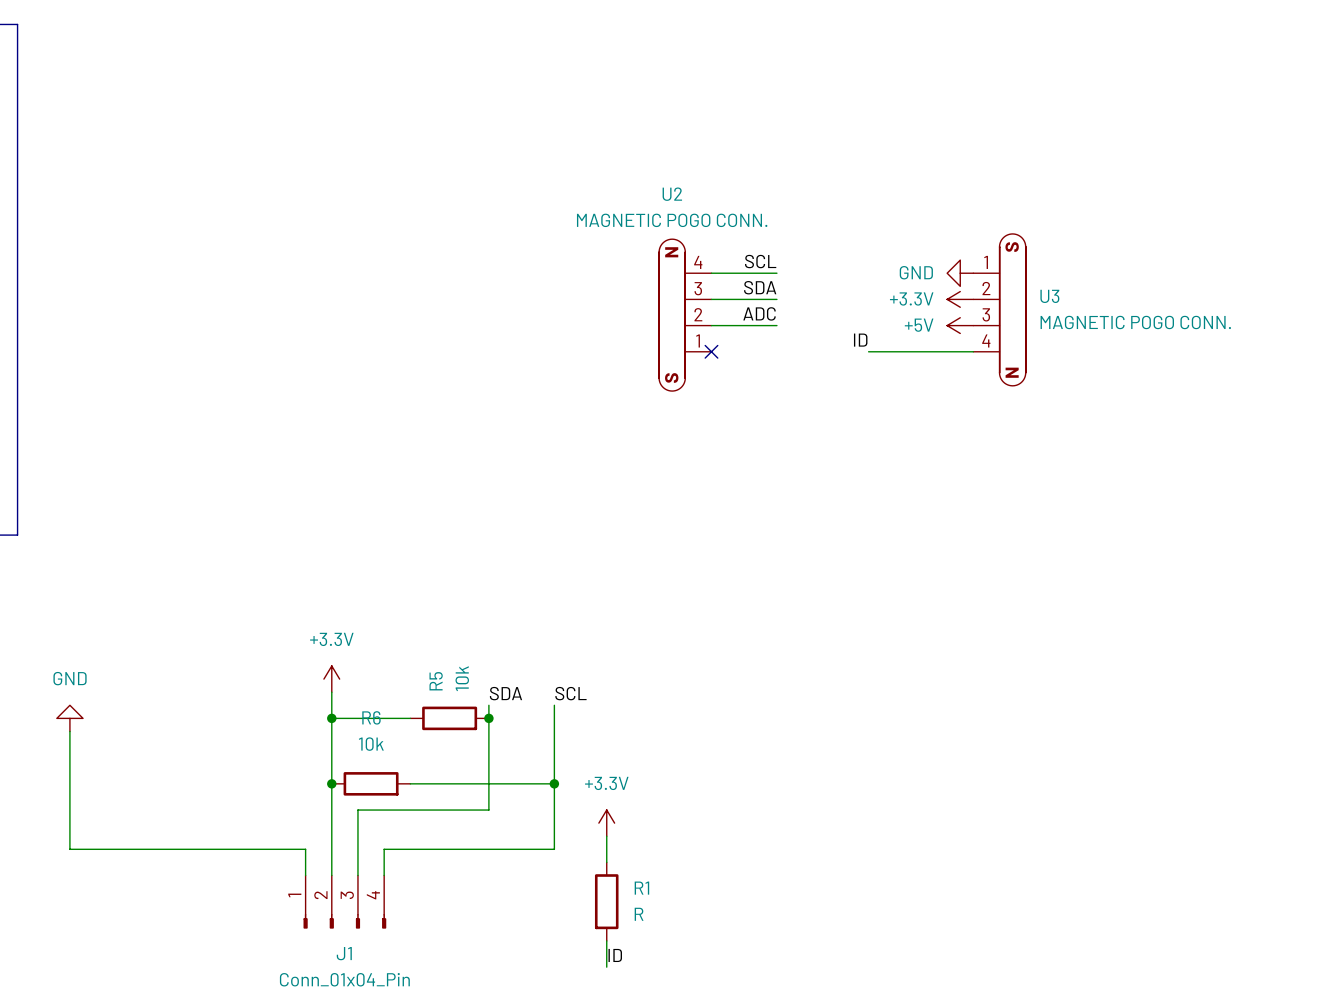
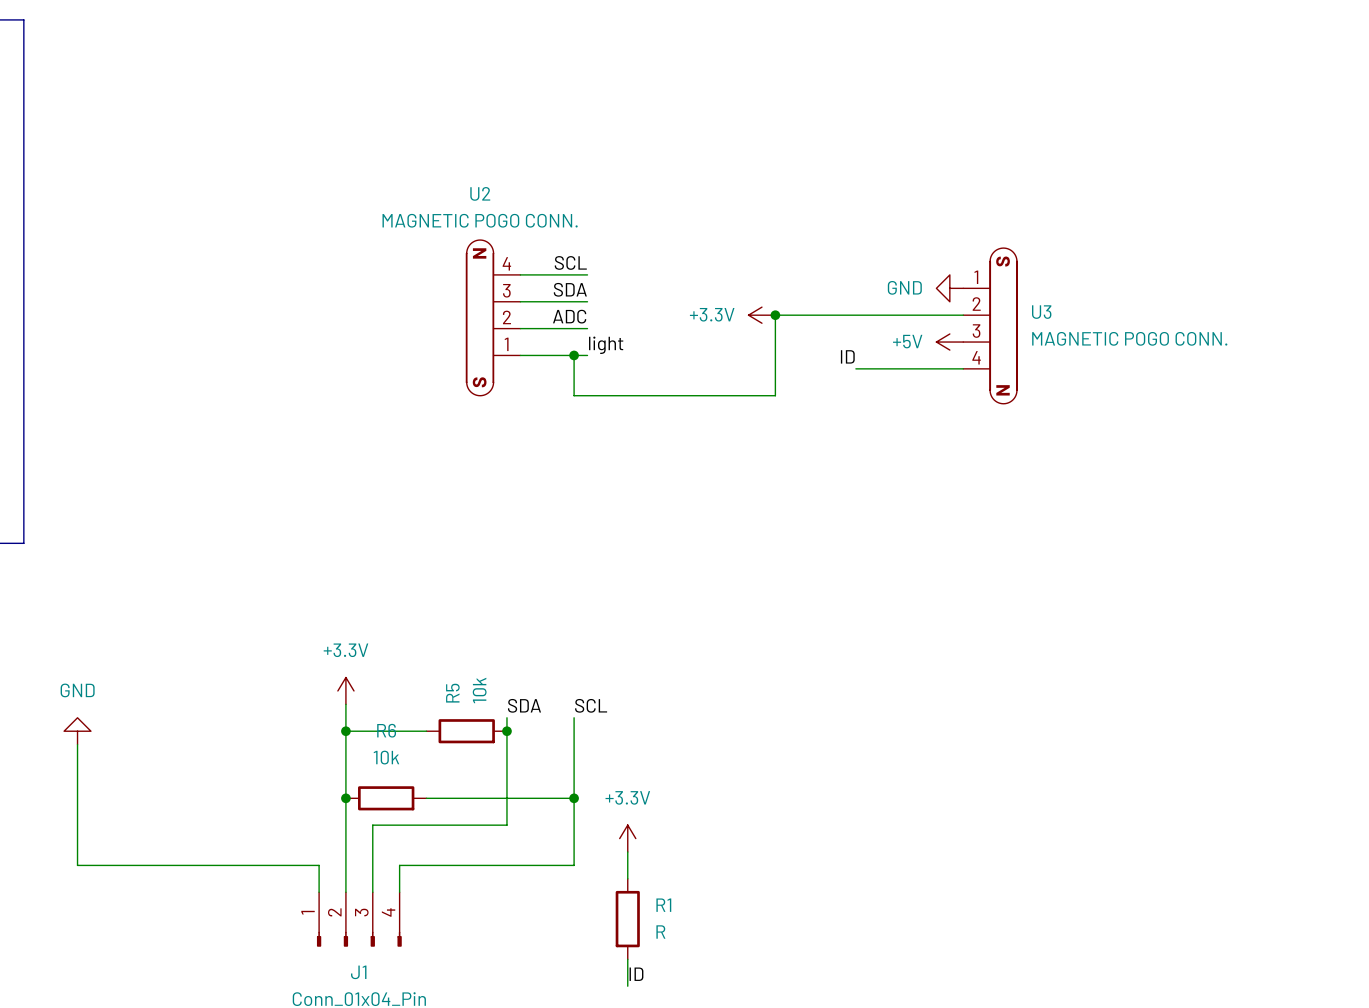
label position: SCL (760, 261) -> SCL (570, 262)
wire: (711, 273) (776, 273) -> (520, 274) (587, 274)
power symbol position: GND (960, 273) -> GND (949, 288)
label position: SDA (760, 287) -> SDA (570, 289)
wire: (711, 299) (776, 299) -> (520, 301) (587, 301)
power symbol position: +3.3V (960, 299) -> +3.3V (761, 315)
U3 position: (999, 309) -> (990, 325)
junction: none -> (775, 315)
wire: none -> (963, 315) (775, 315) (775, 395) (574, 395) (574, 355)
label position: ADC (759, 313) -> ADC (569, 316)
U2 position: (685, 315) -> (493, 317)
wire: (711, 325) (776, 325) -> (520, 328) (587, 328)
power symbol position: +5V (960, 325) -> +5V (949, 342)
label position: ID (860, 340) -> ID (847, 356)
label: none -> light (606, 345)
wire: none -> (520, 355) (587, 355)
junction: none -> (574, 355)
no-connect mark: (711, 351) -> none
wire: (868, 351) (973, 351) -> (855, 368) (963, 368)

